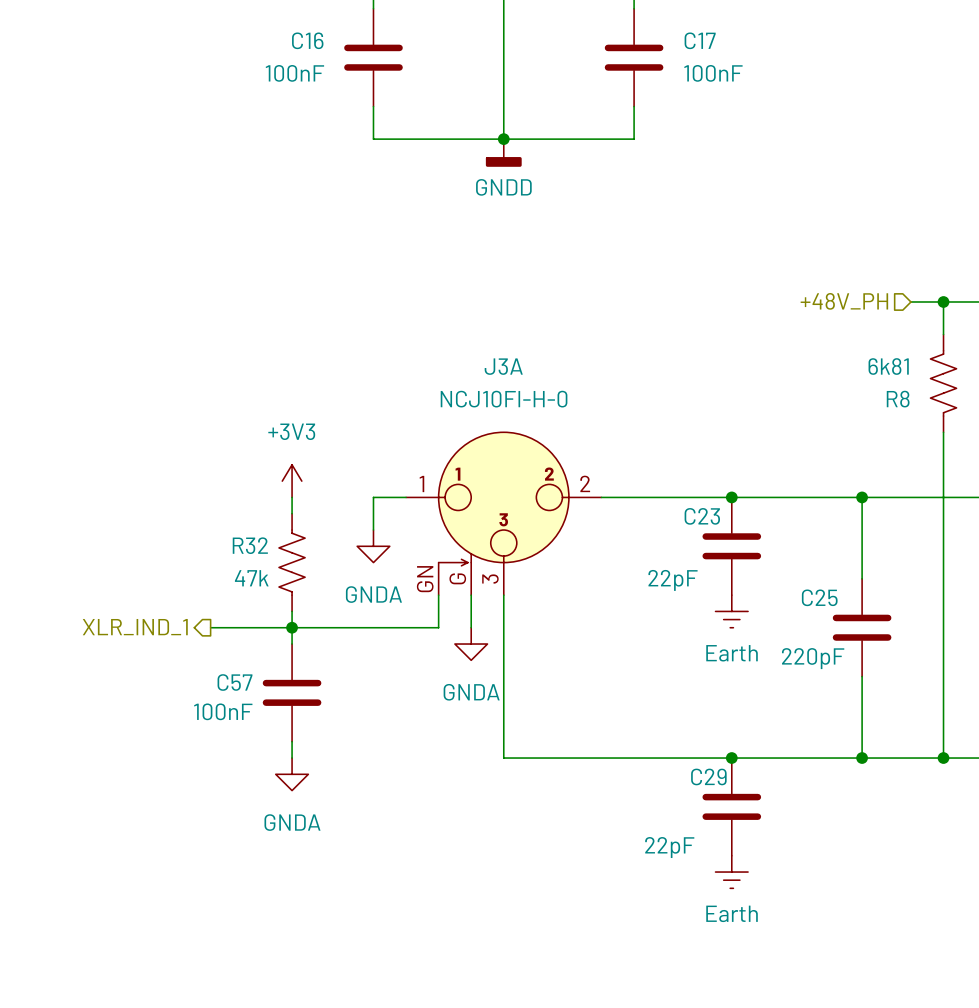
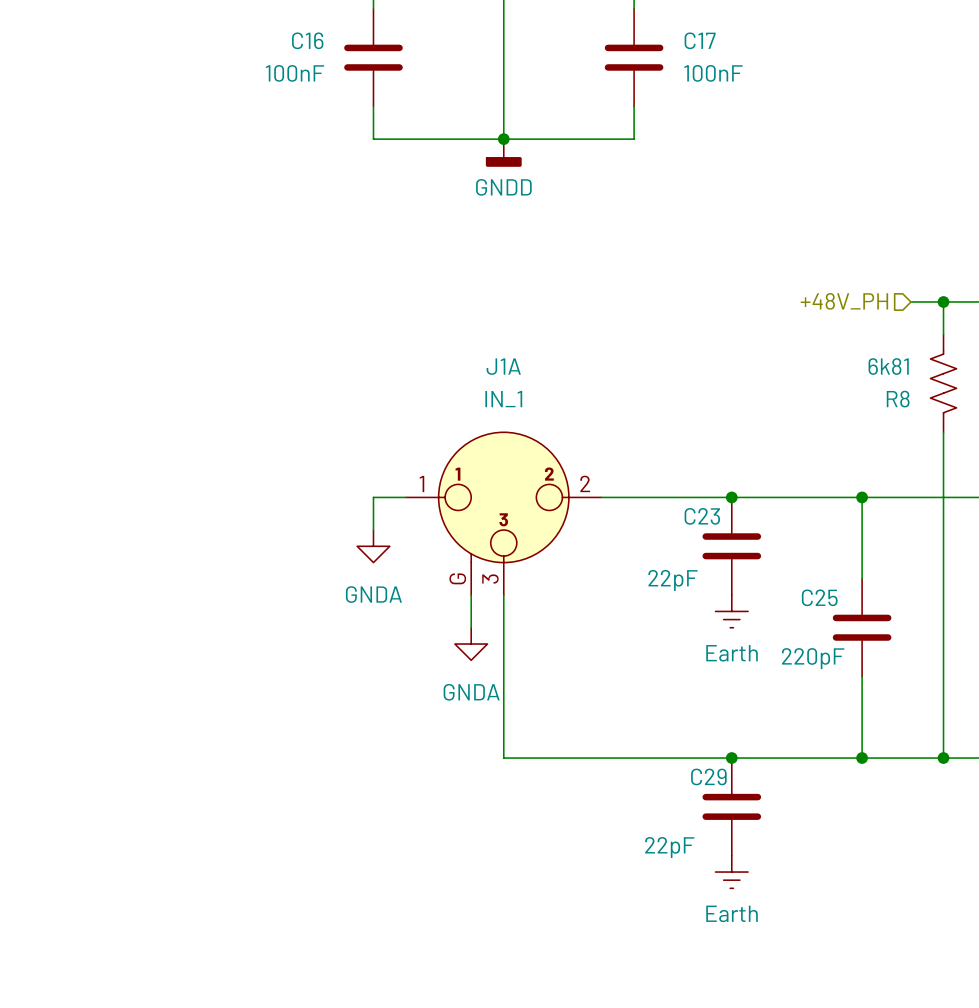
power symbol: +3V3 (292, 481) -> none
wire: (292, 497) (292, 513) -> none
J3A: NCJ10FI-H-0 (503, 513) -> none
J1A: none -> IN_1 (503, 513)
R32: 47k (292, 562) -> none
wire: (438, 595) (438, 627) (210, 627) -> none
wire: (292, 611) (292, 644) -> none
hierarchical label: XLR_IND_1 (135, 627) -> none
junction: (292, 627) -> none
C57: 100nF (292, 692) -> none
wire: (292, 741) (292, 758) -> none
power symbol: GNDA (292, 774) -> none

